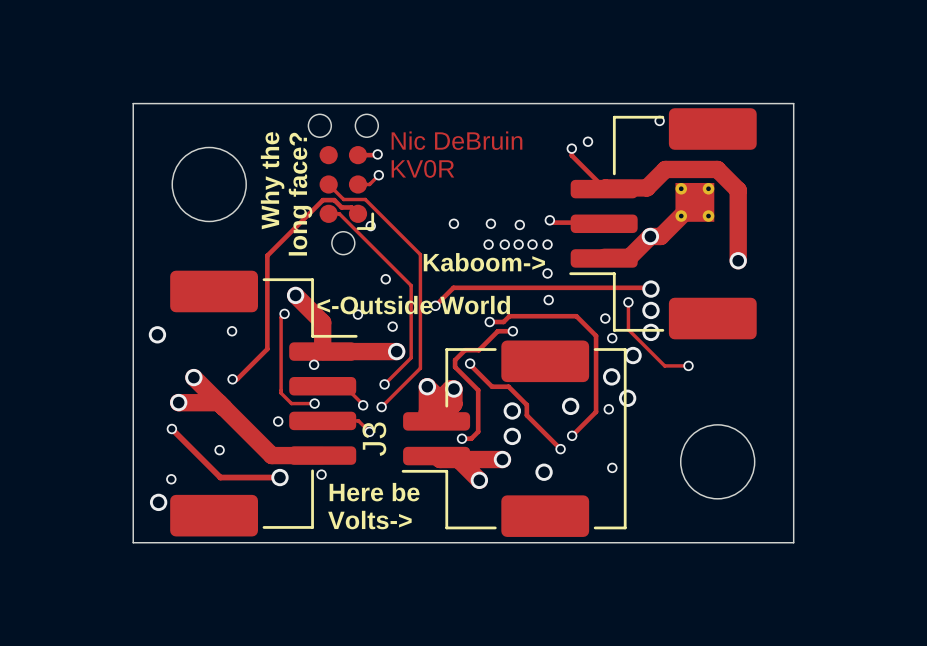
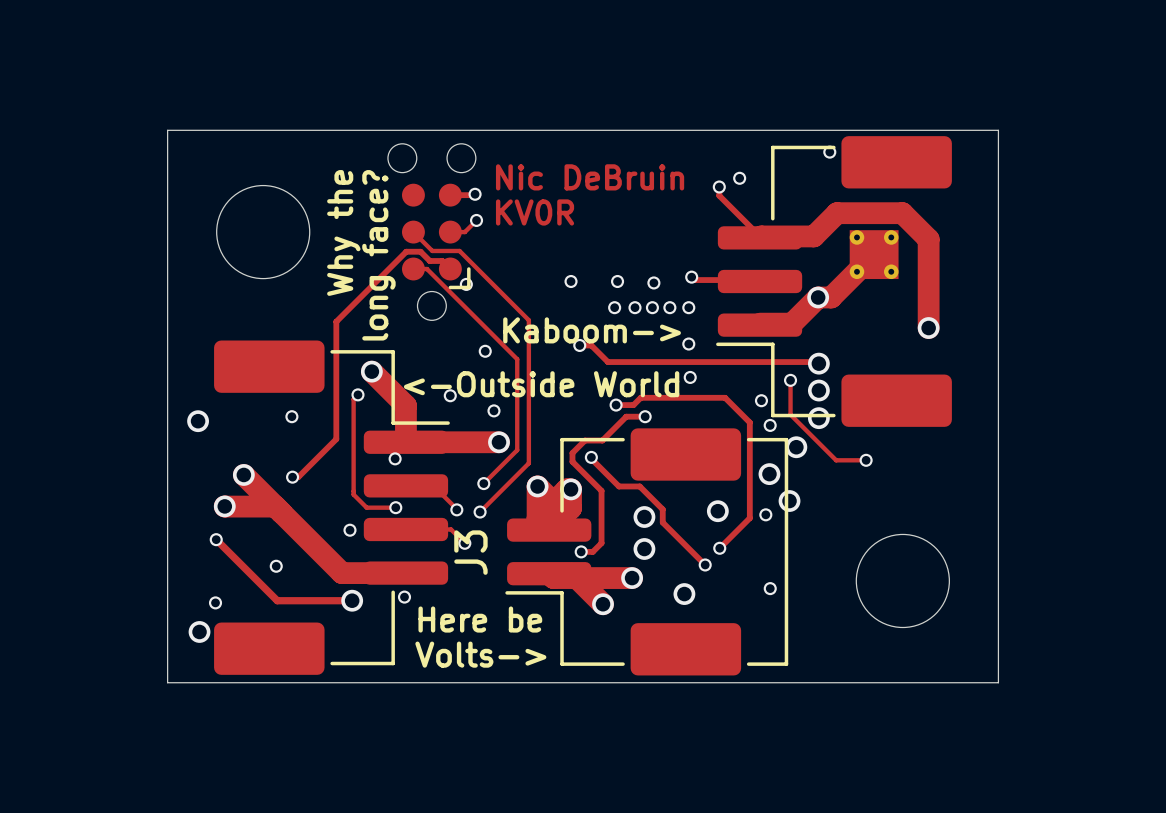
track: (483, 287) (453, 287) (435, 305) -> (607, 362) (591, 345) (579, 345)
via position: (435, 305) -> (579, 345)

